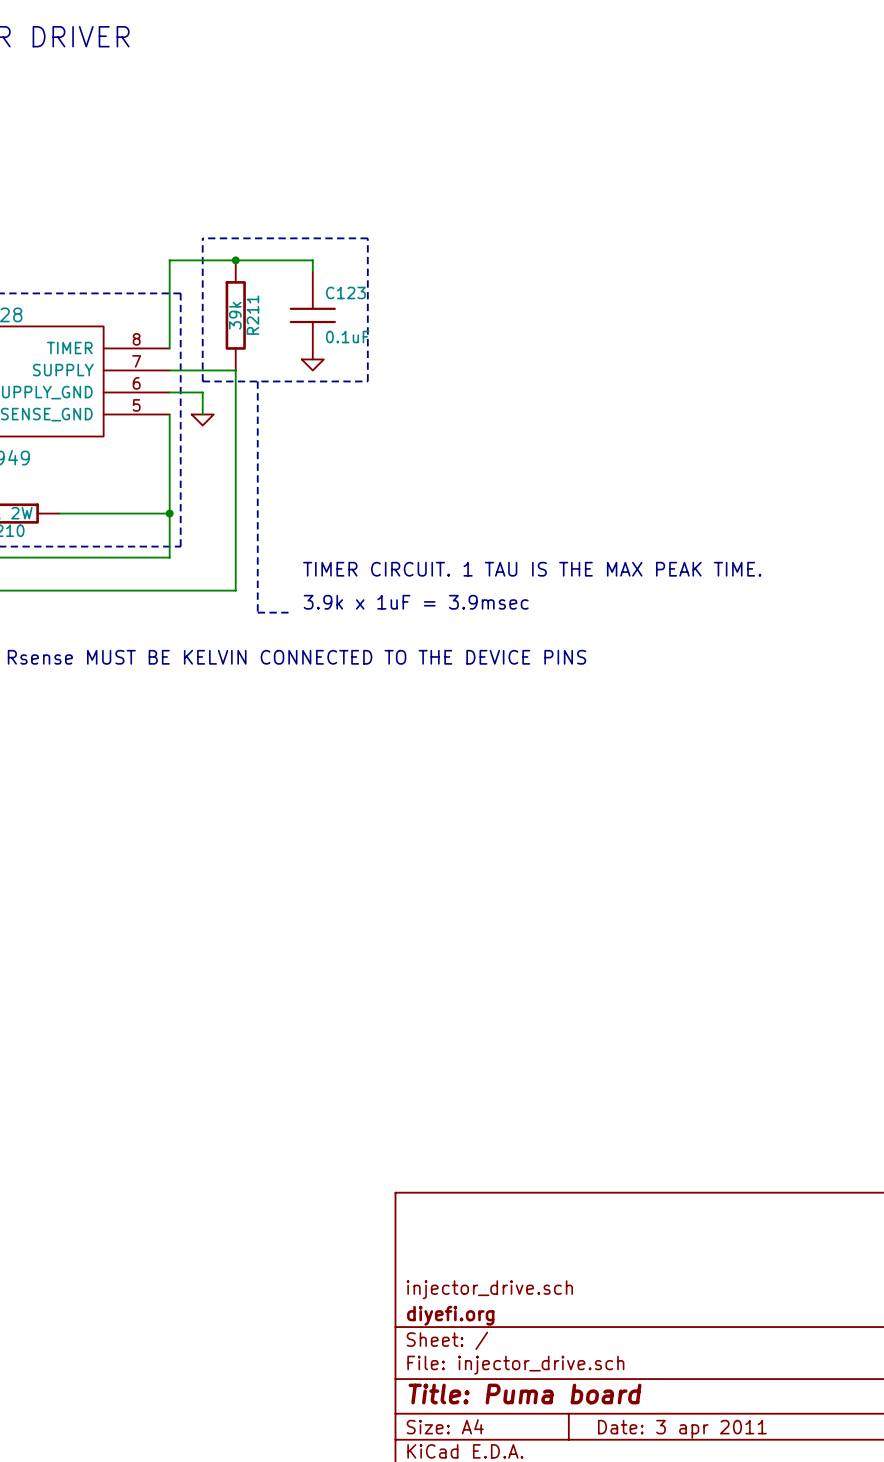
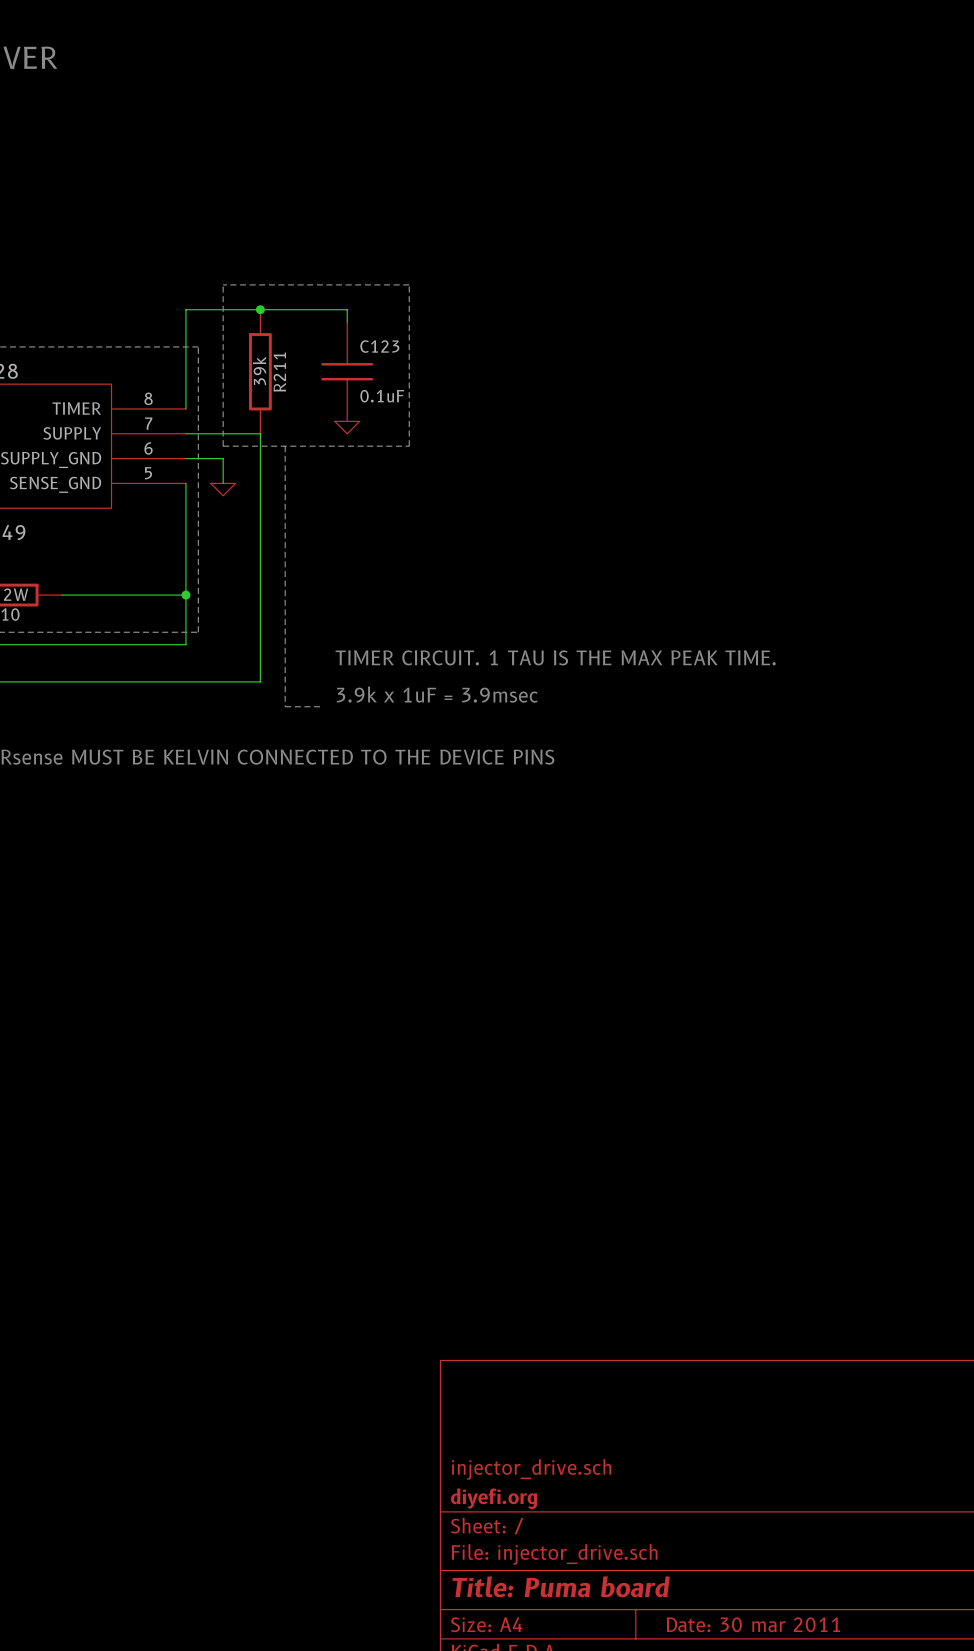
title block: Date: 3 apr 2011 (682, 1429) -> Date: 30 mar 2011 (753, 1624)

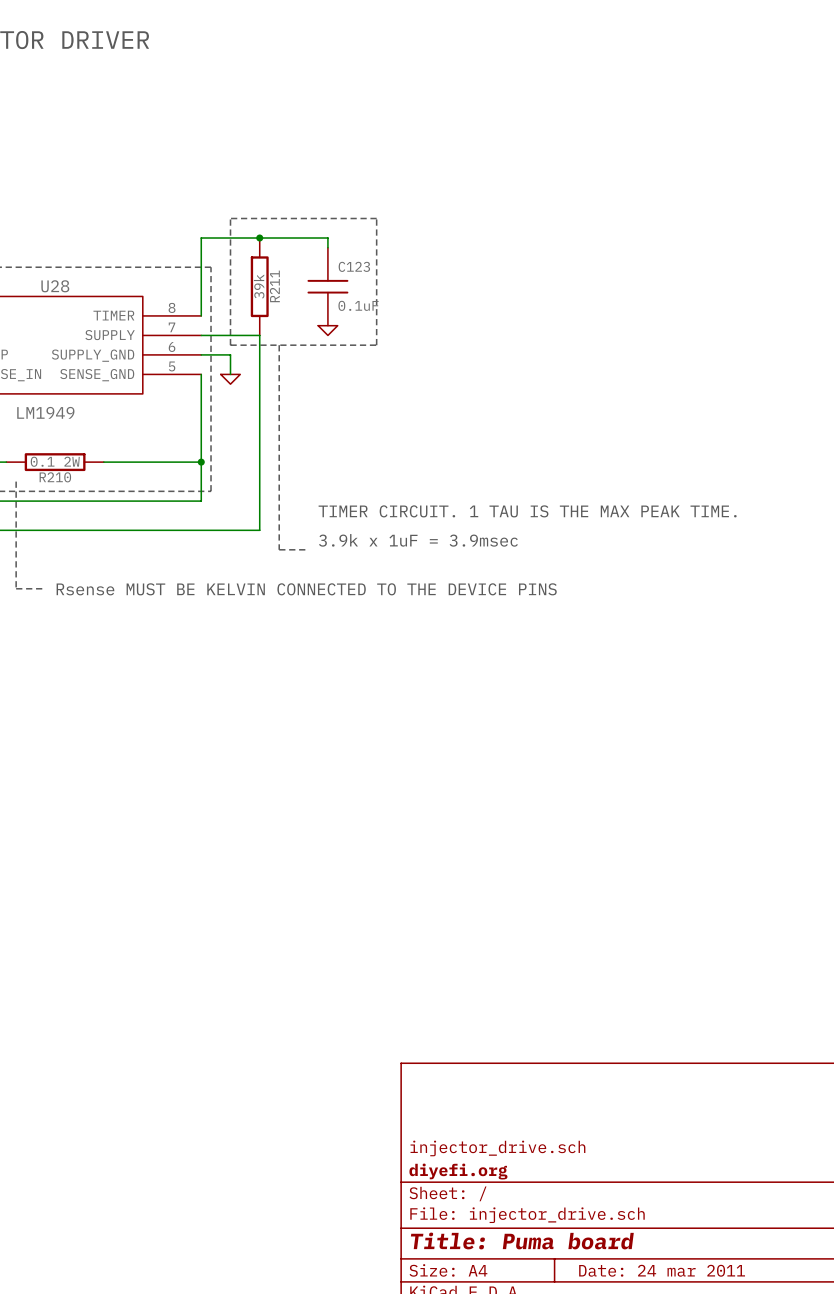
title block: Date: 30 mar 2011 (753, 1624) -> Date: 24 mar 2011 (662, 1270)

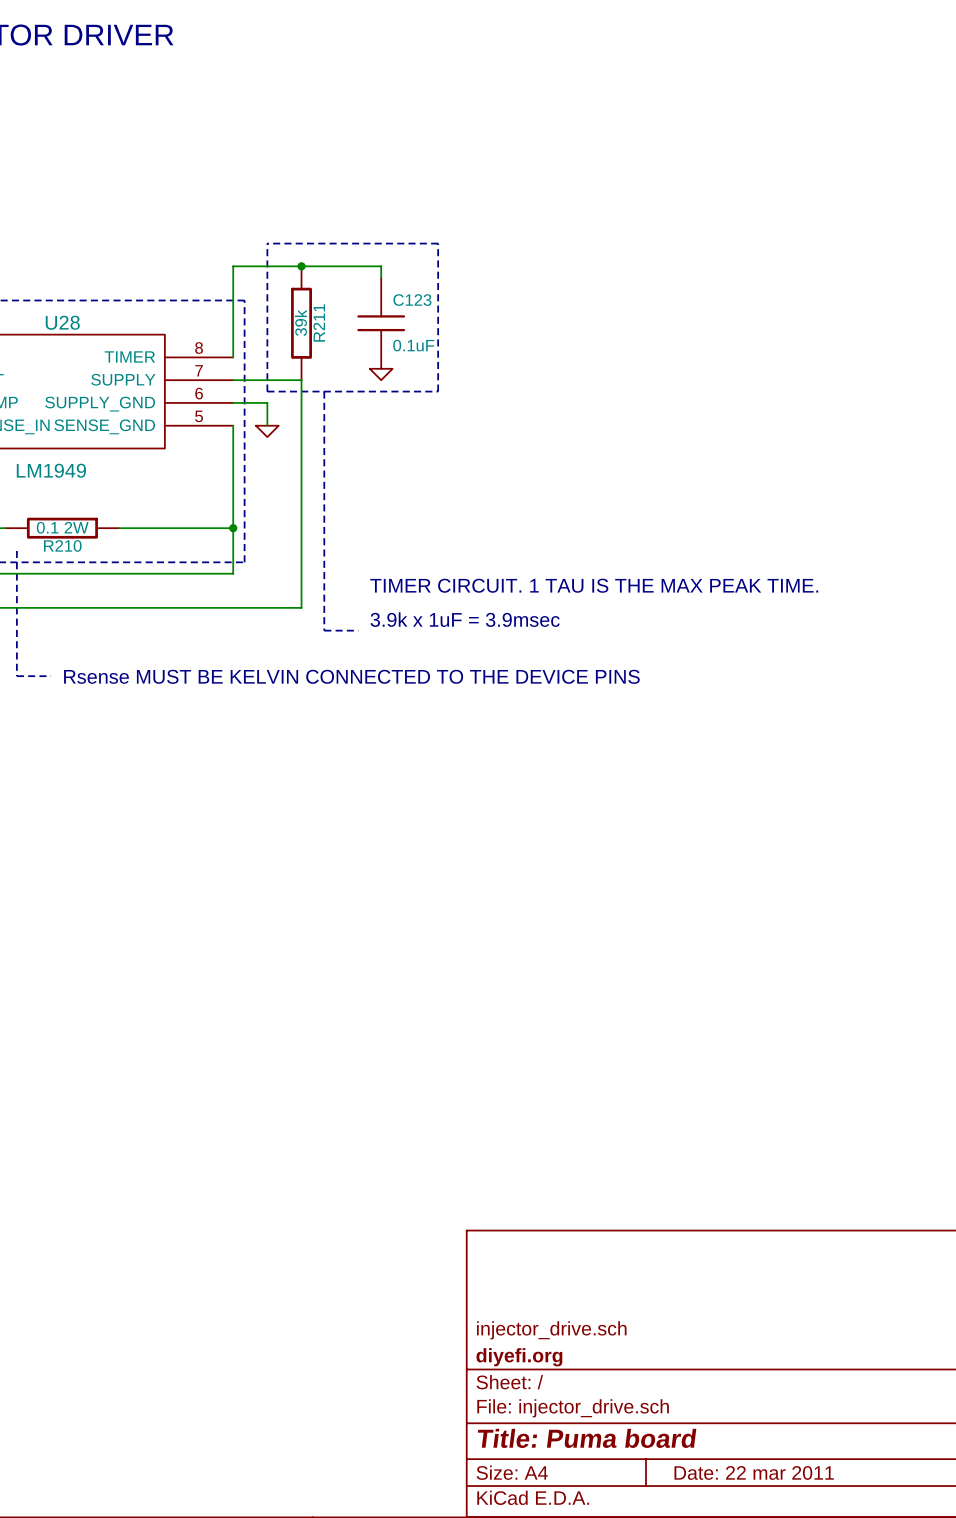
title block: Date: 24 mar 2011 (662, 1270) -> Date: 22 mar 2011 (754, 1472)

